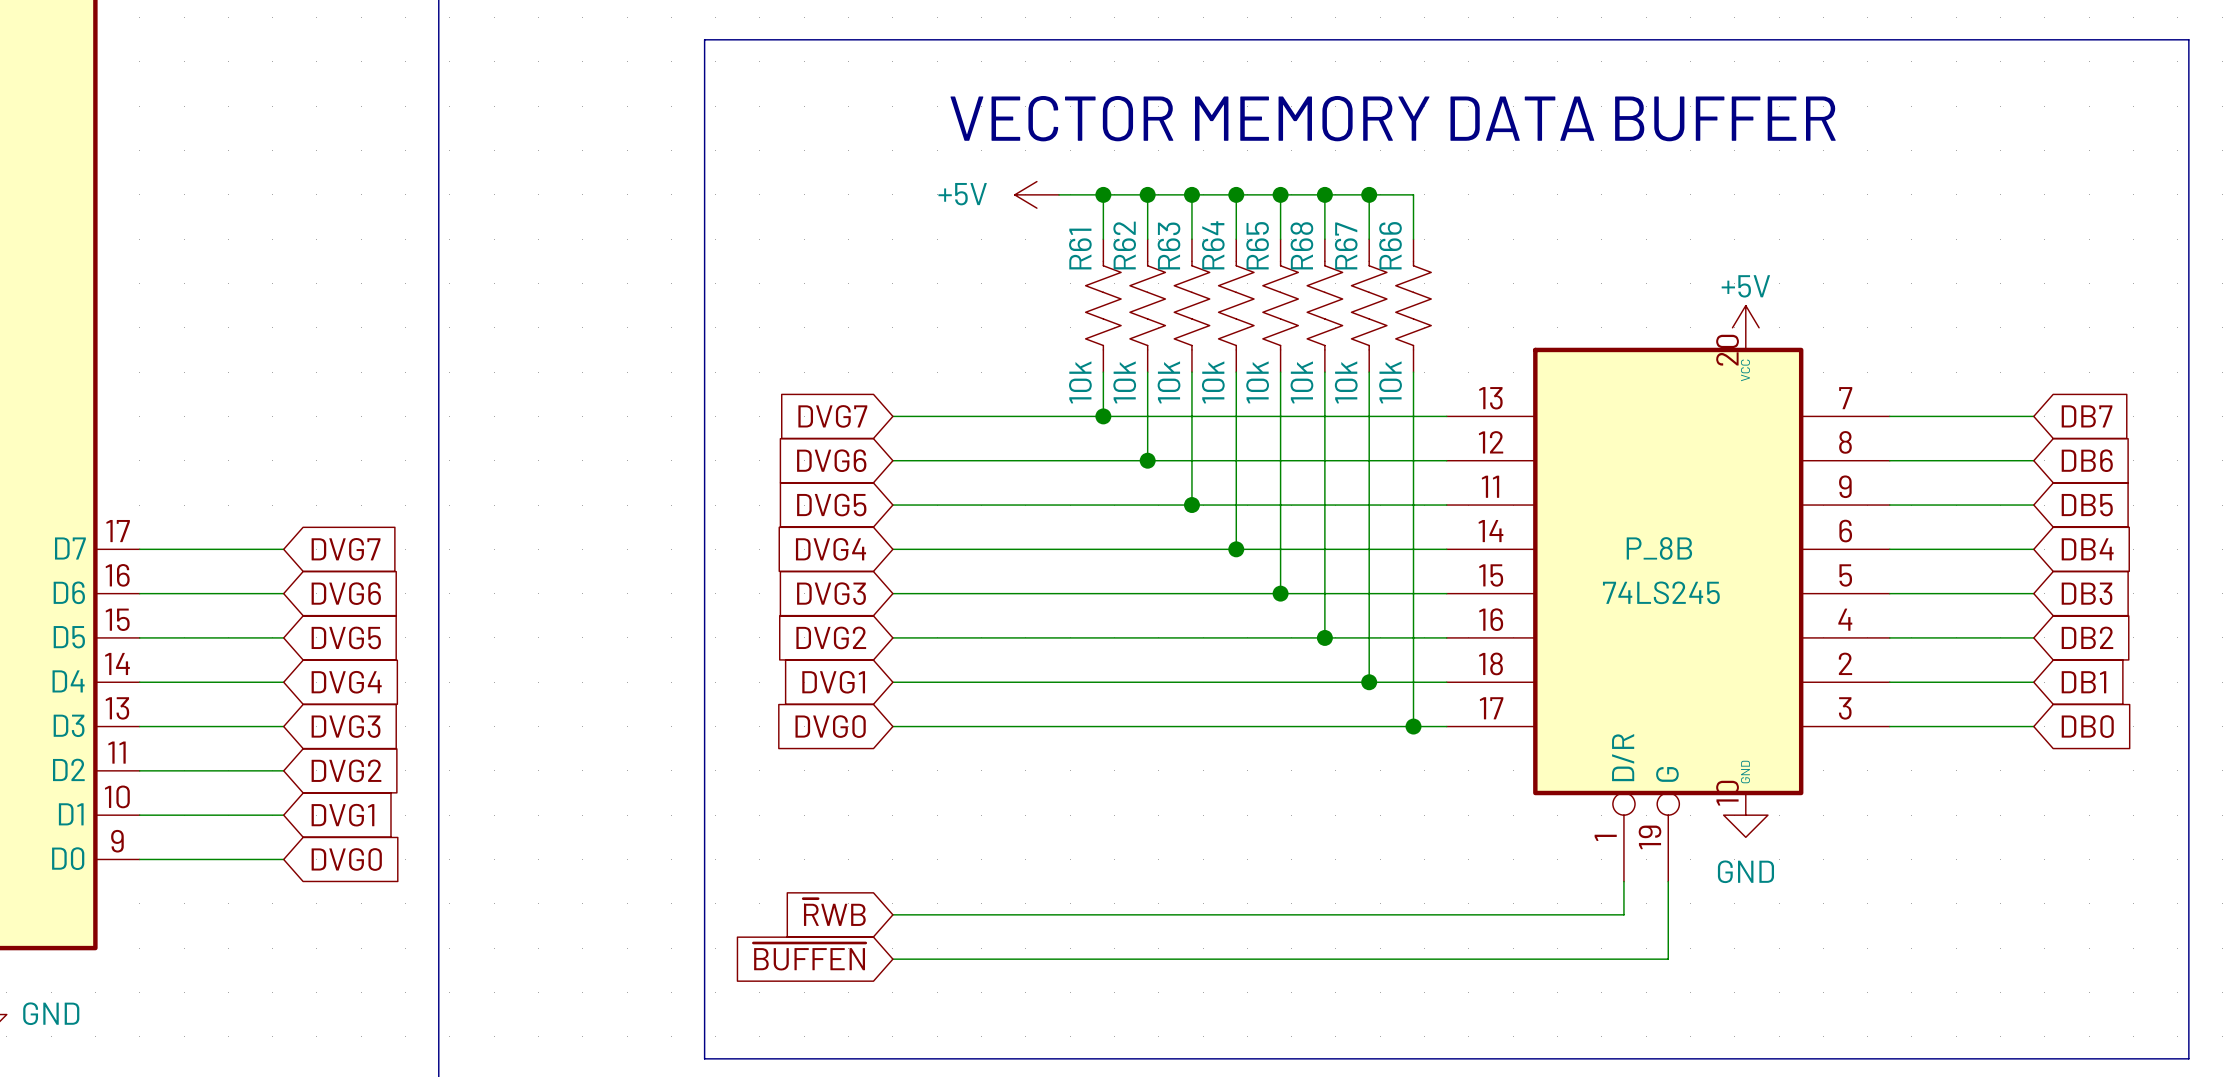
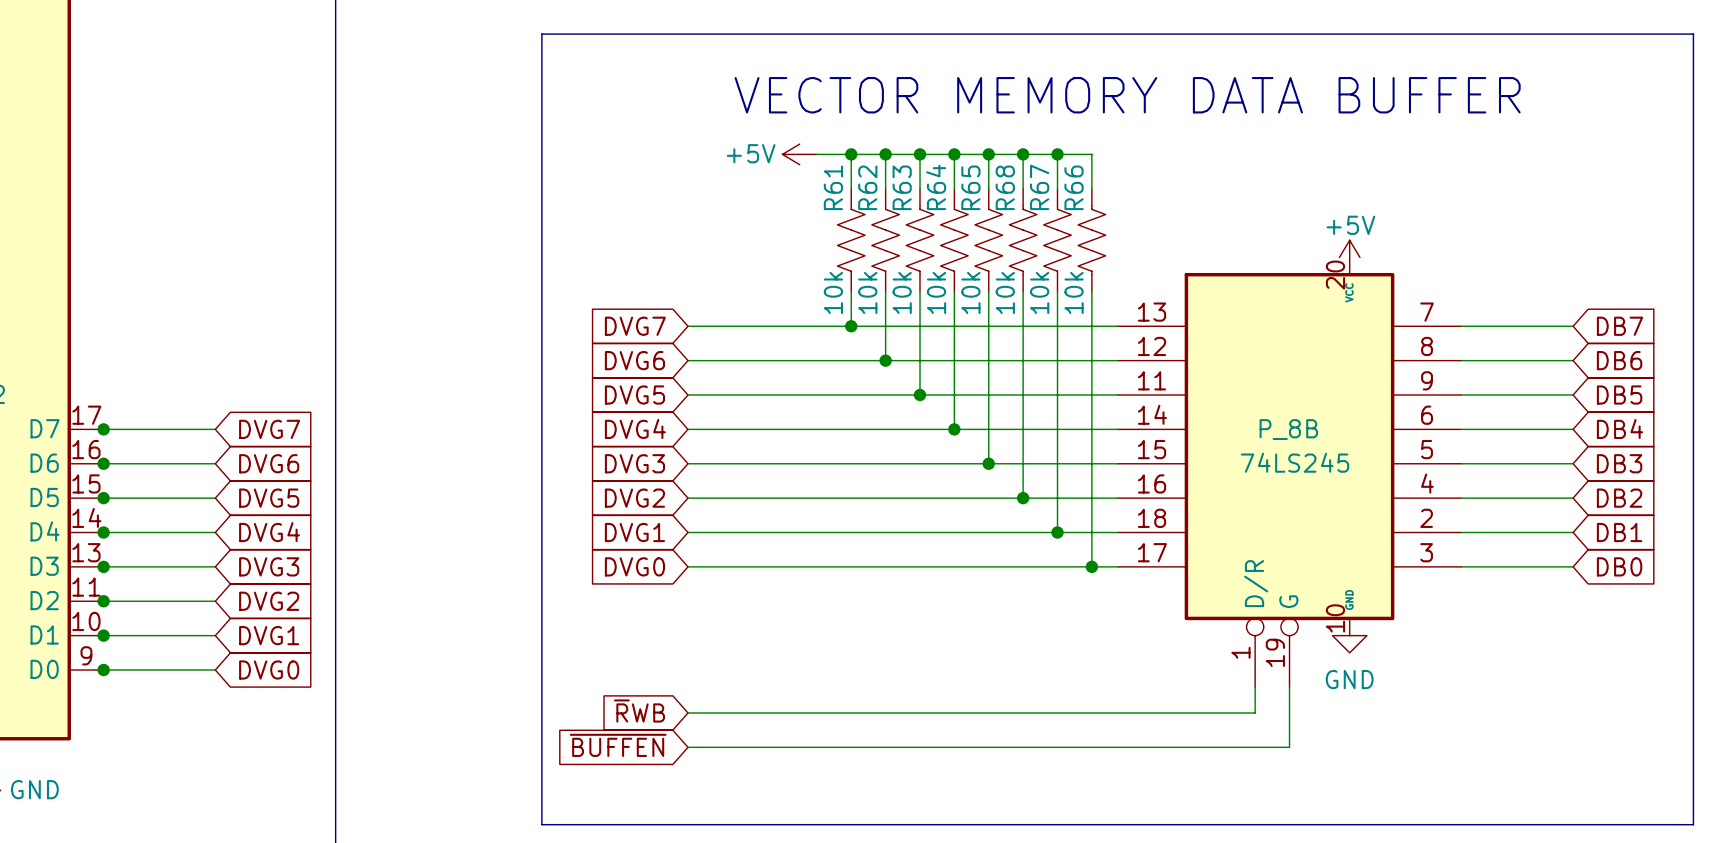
junction: none -> (103, 429)
junction: none -> (103, 463)
junction: none -> (103, 498)
junction: none -> (103, 532)
junction: none -> (103, 566)
junction: none -> (103, 601)
junction: none -> (103, 635)
junction: none -> (103, 670)

